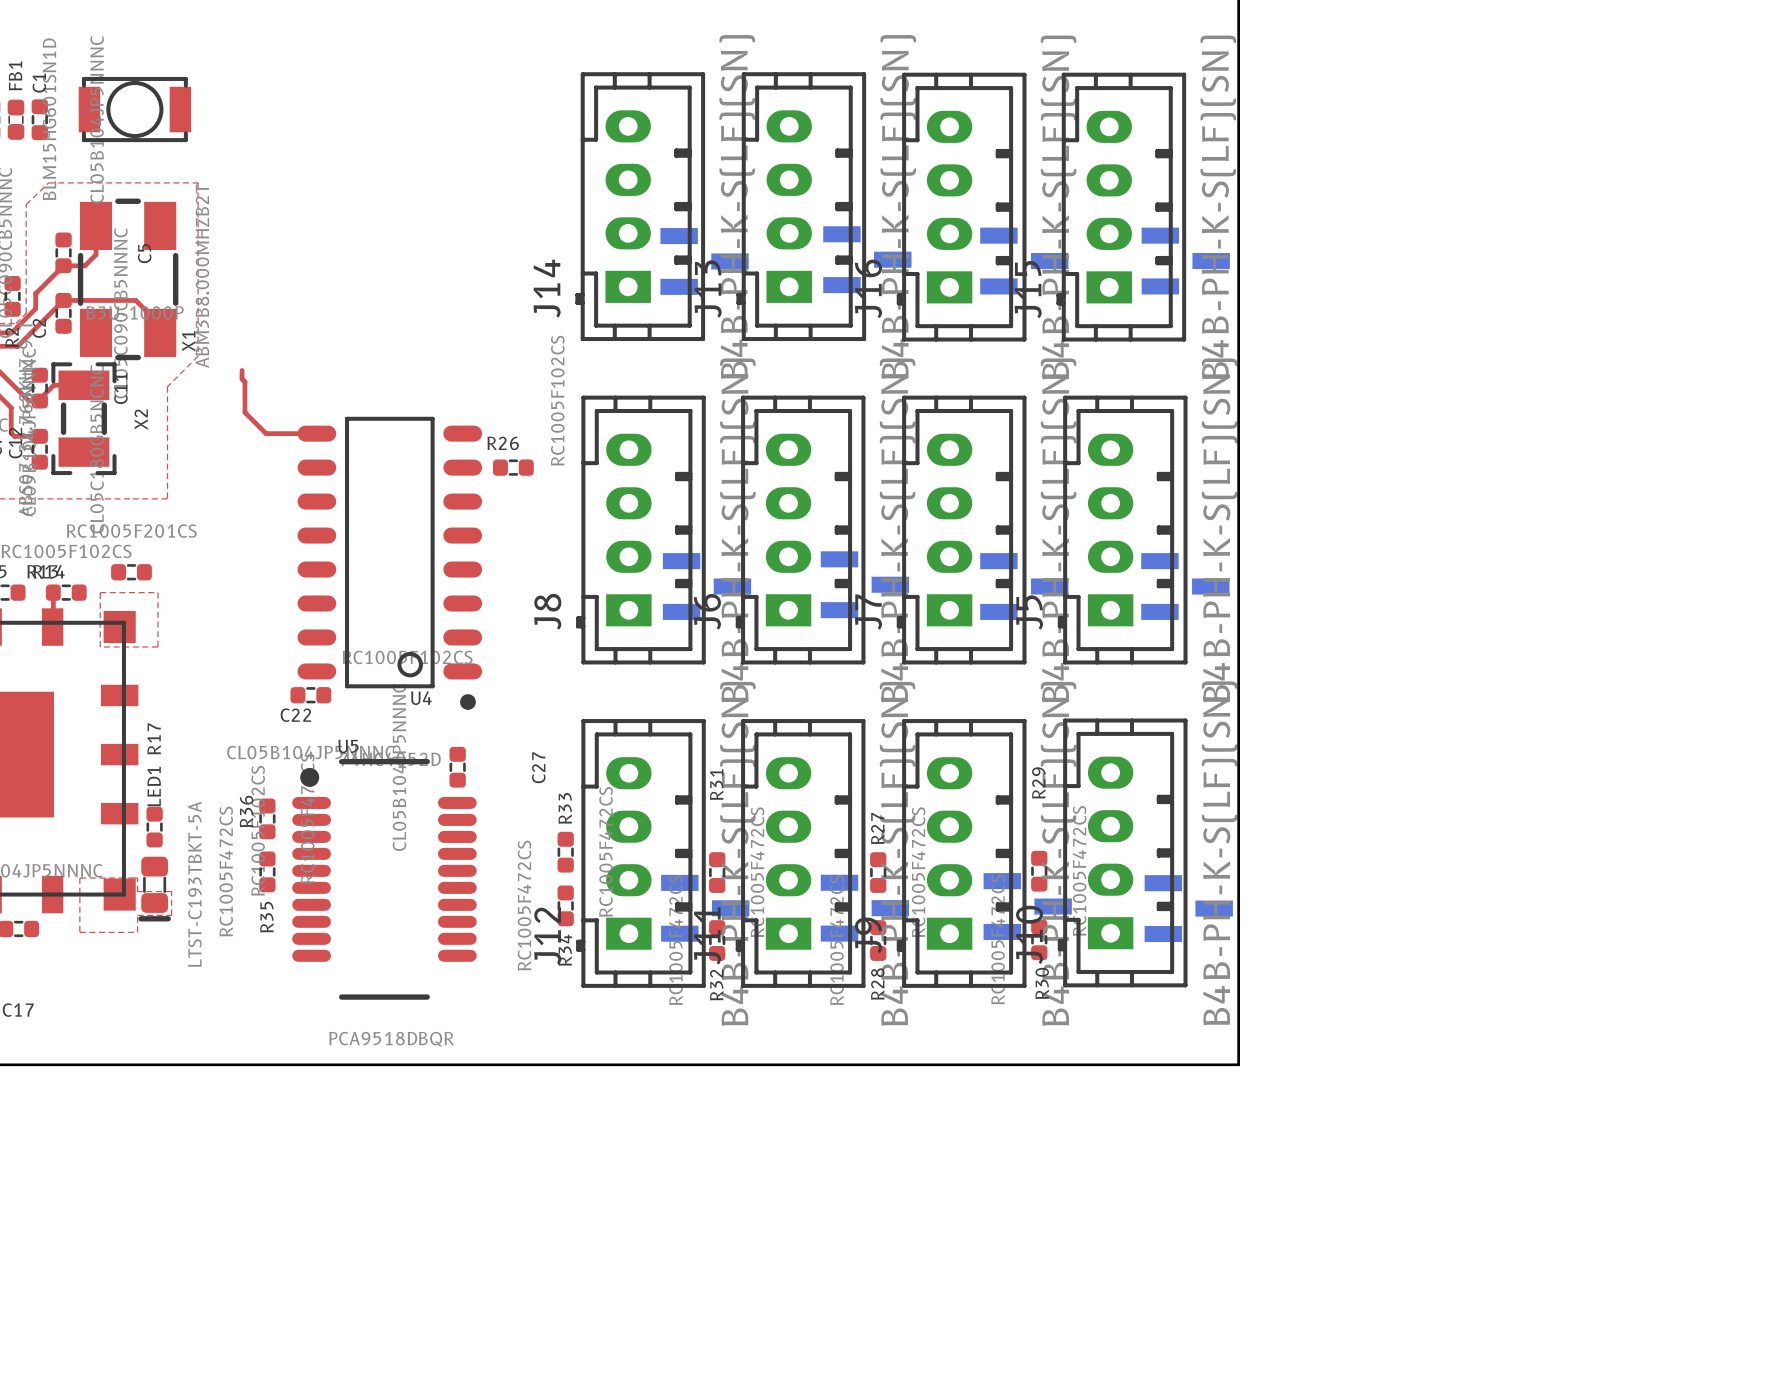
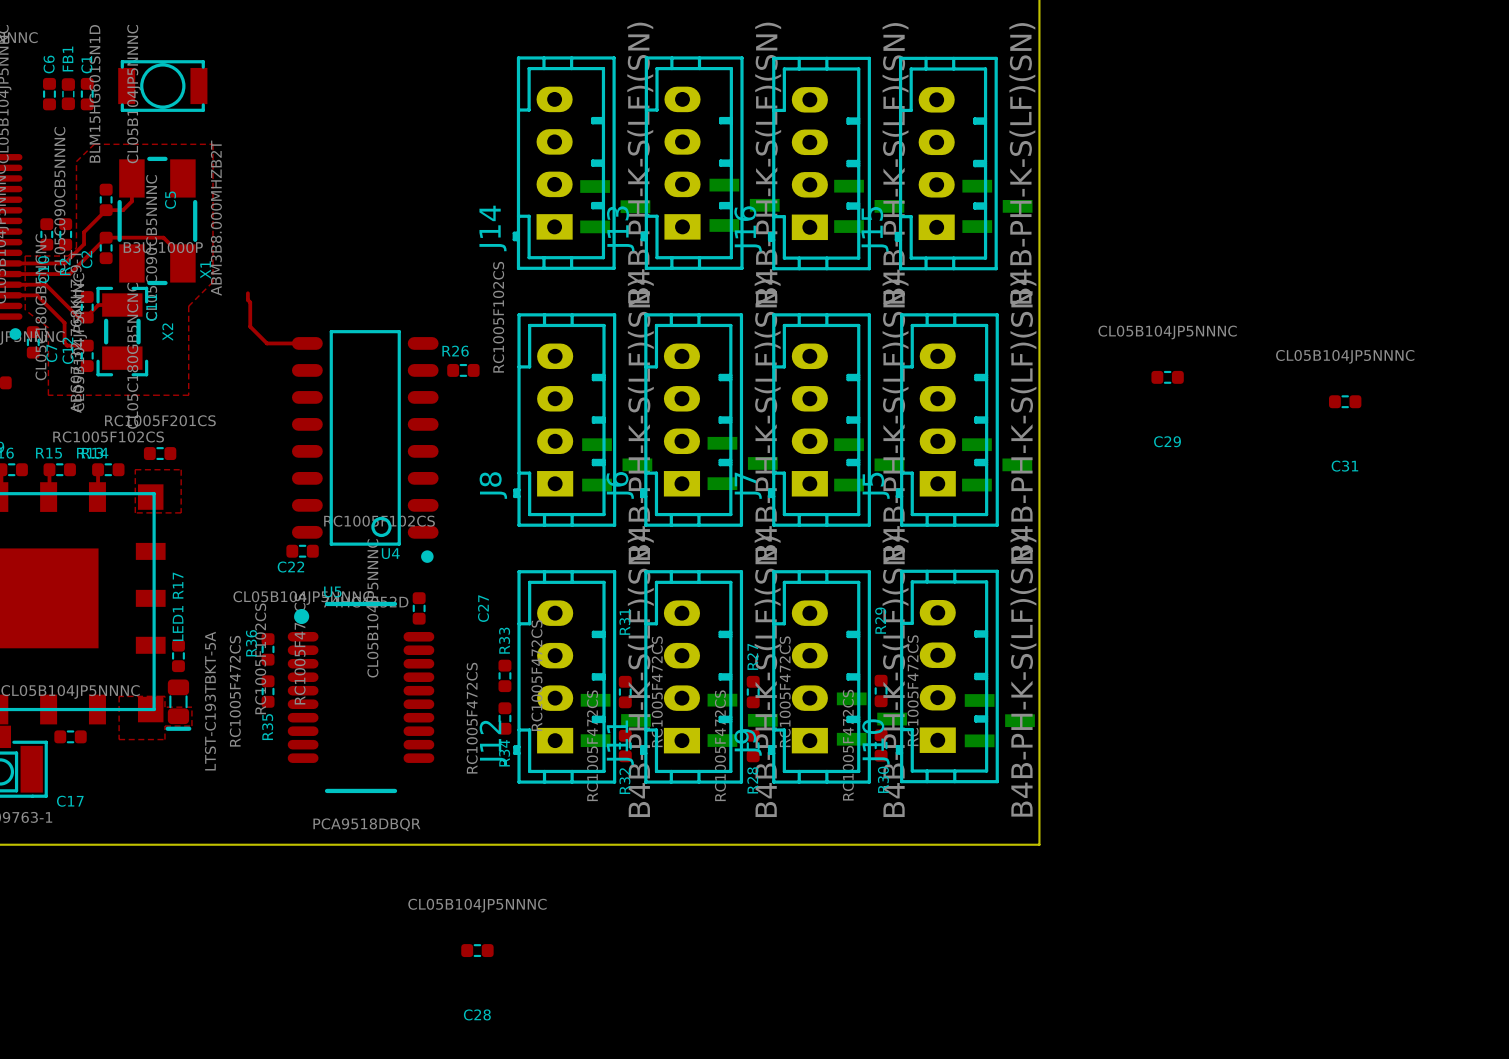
C29: none -> CL05B104JP5NNNC (1167, 377)
C31: none -> CL05B104JP5NNNC (1345, 401)
C28: none -> CL05B104JP5NNNC (477, 950)

